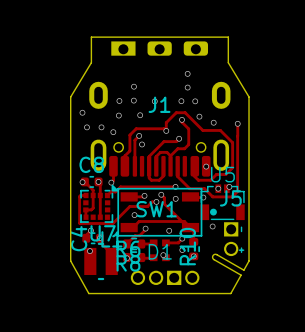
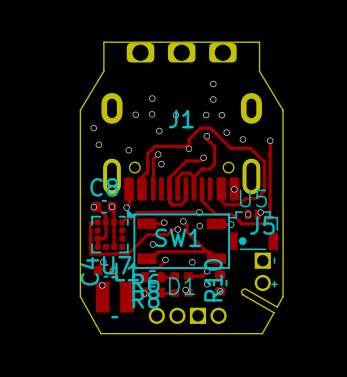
part footprint: [111, 41, 209, 56] -> [126, 43, 237, 63]
via: (118, 115) -> none
via: (101, 127) -> none
via: (212, 226) -> none

